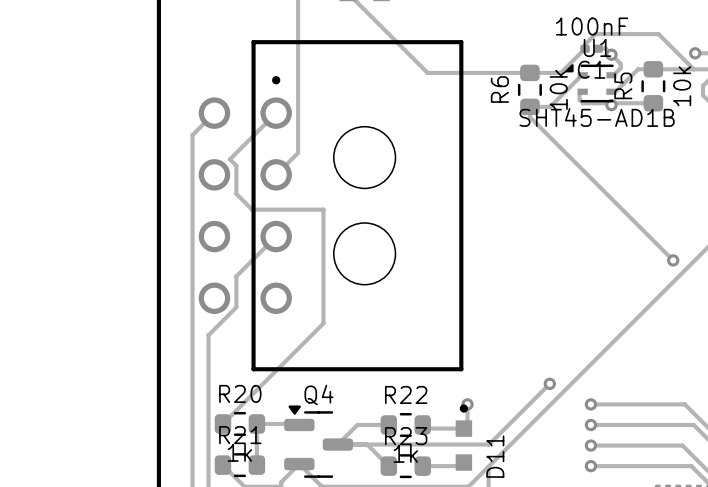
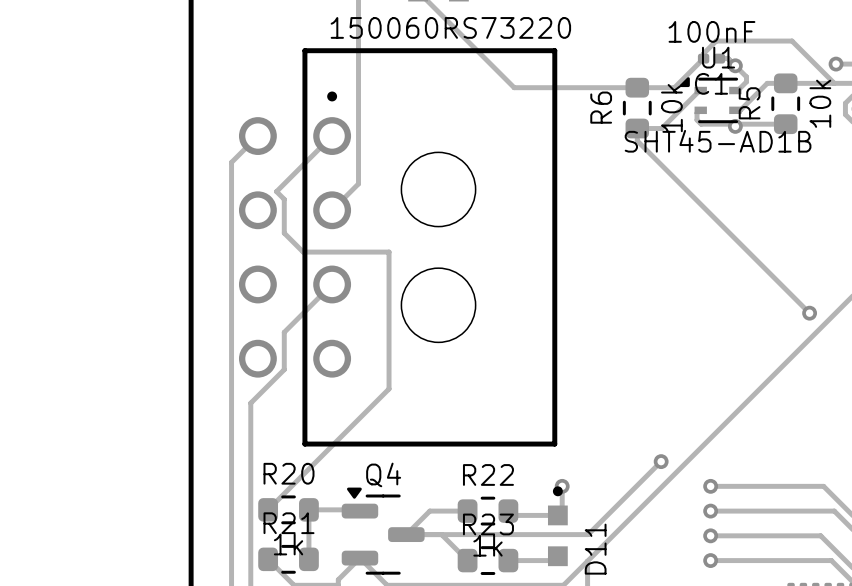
part value: none -> 150060RS73220 (450, 27)

